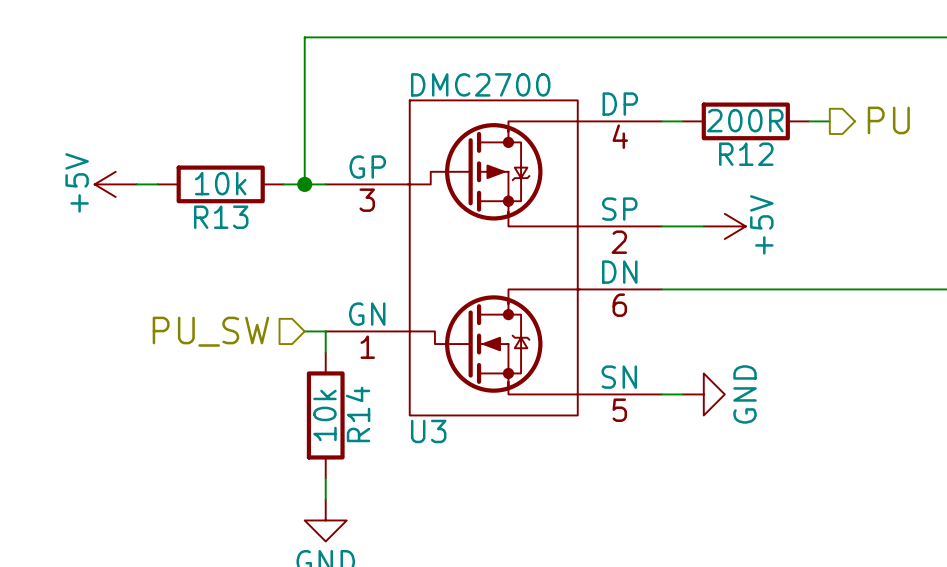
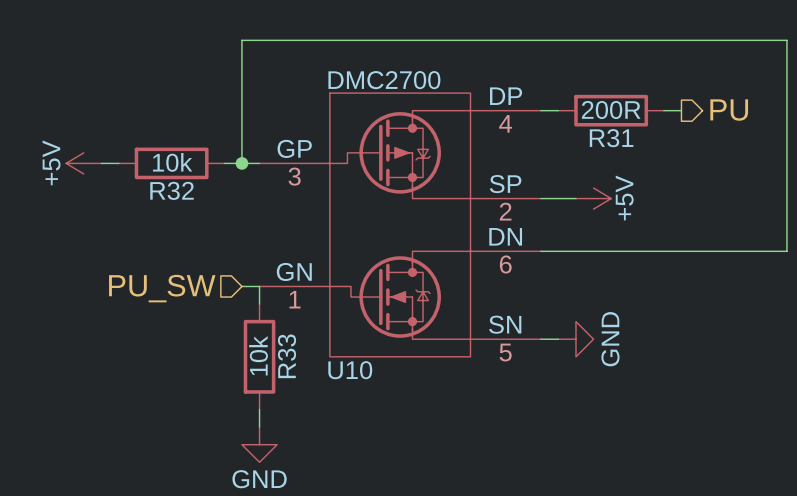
R12 name: R12 (746, 154) -> R31 (611, 138)
R13 name: R13 (221, 217) -> R32 (172, 190)
R14 name: R14 (358, 414) -> R33 (287, 356)
U3 name: U3 (428, 431) -> U10 (350, 370)

